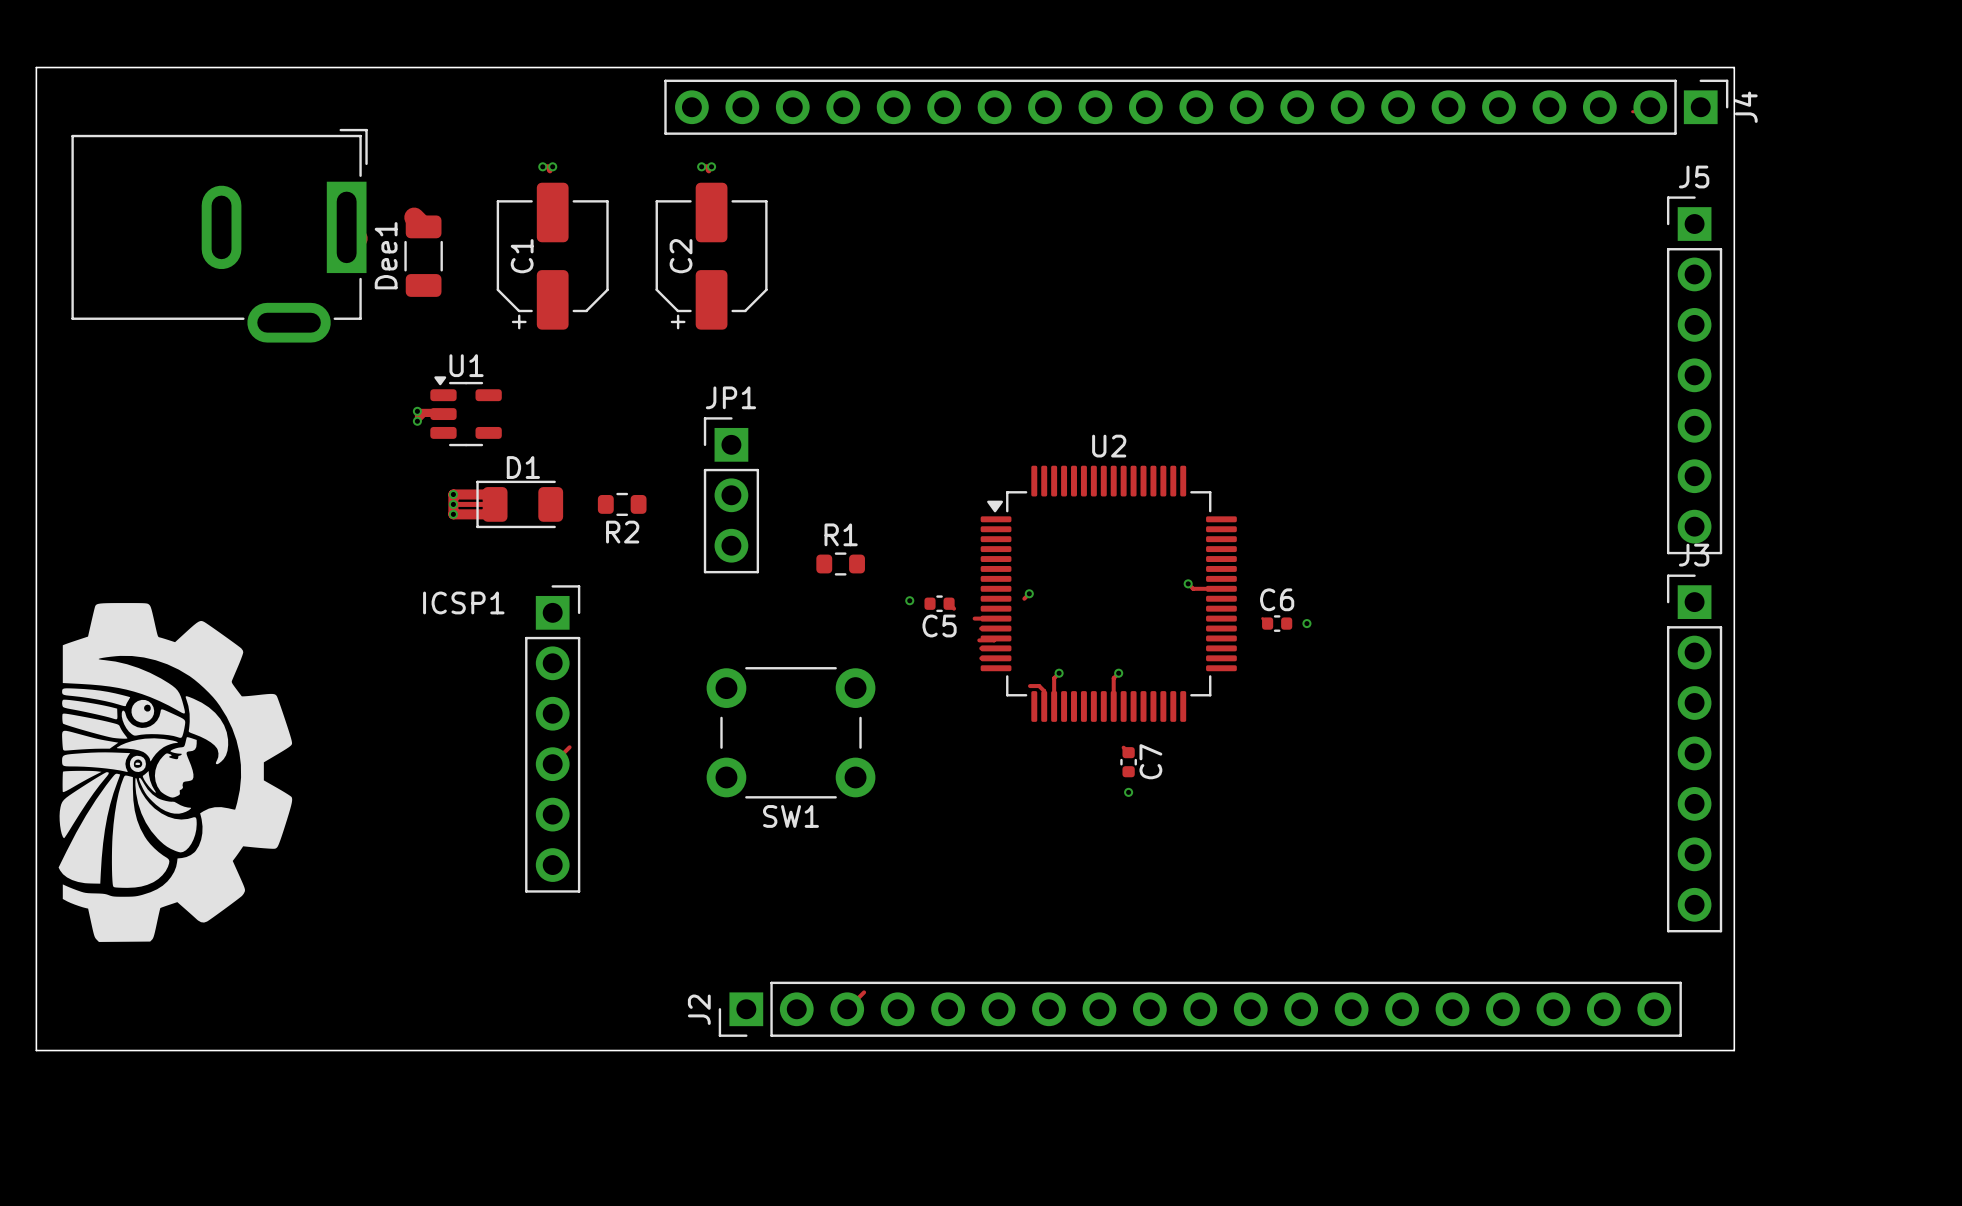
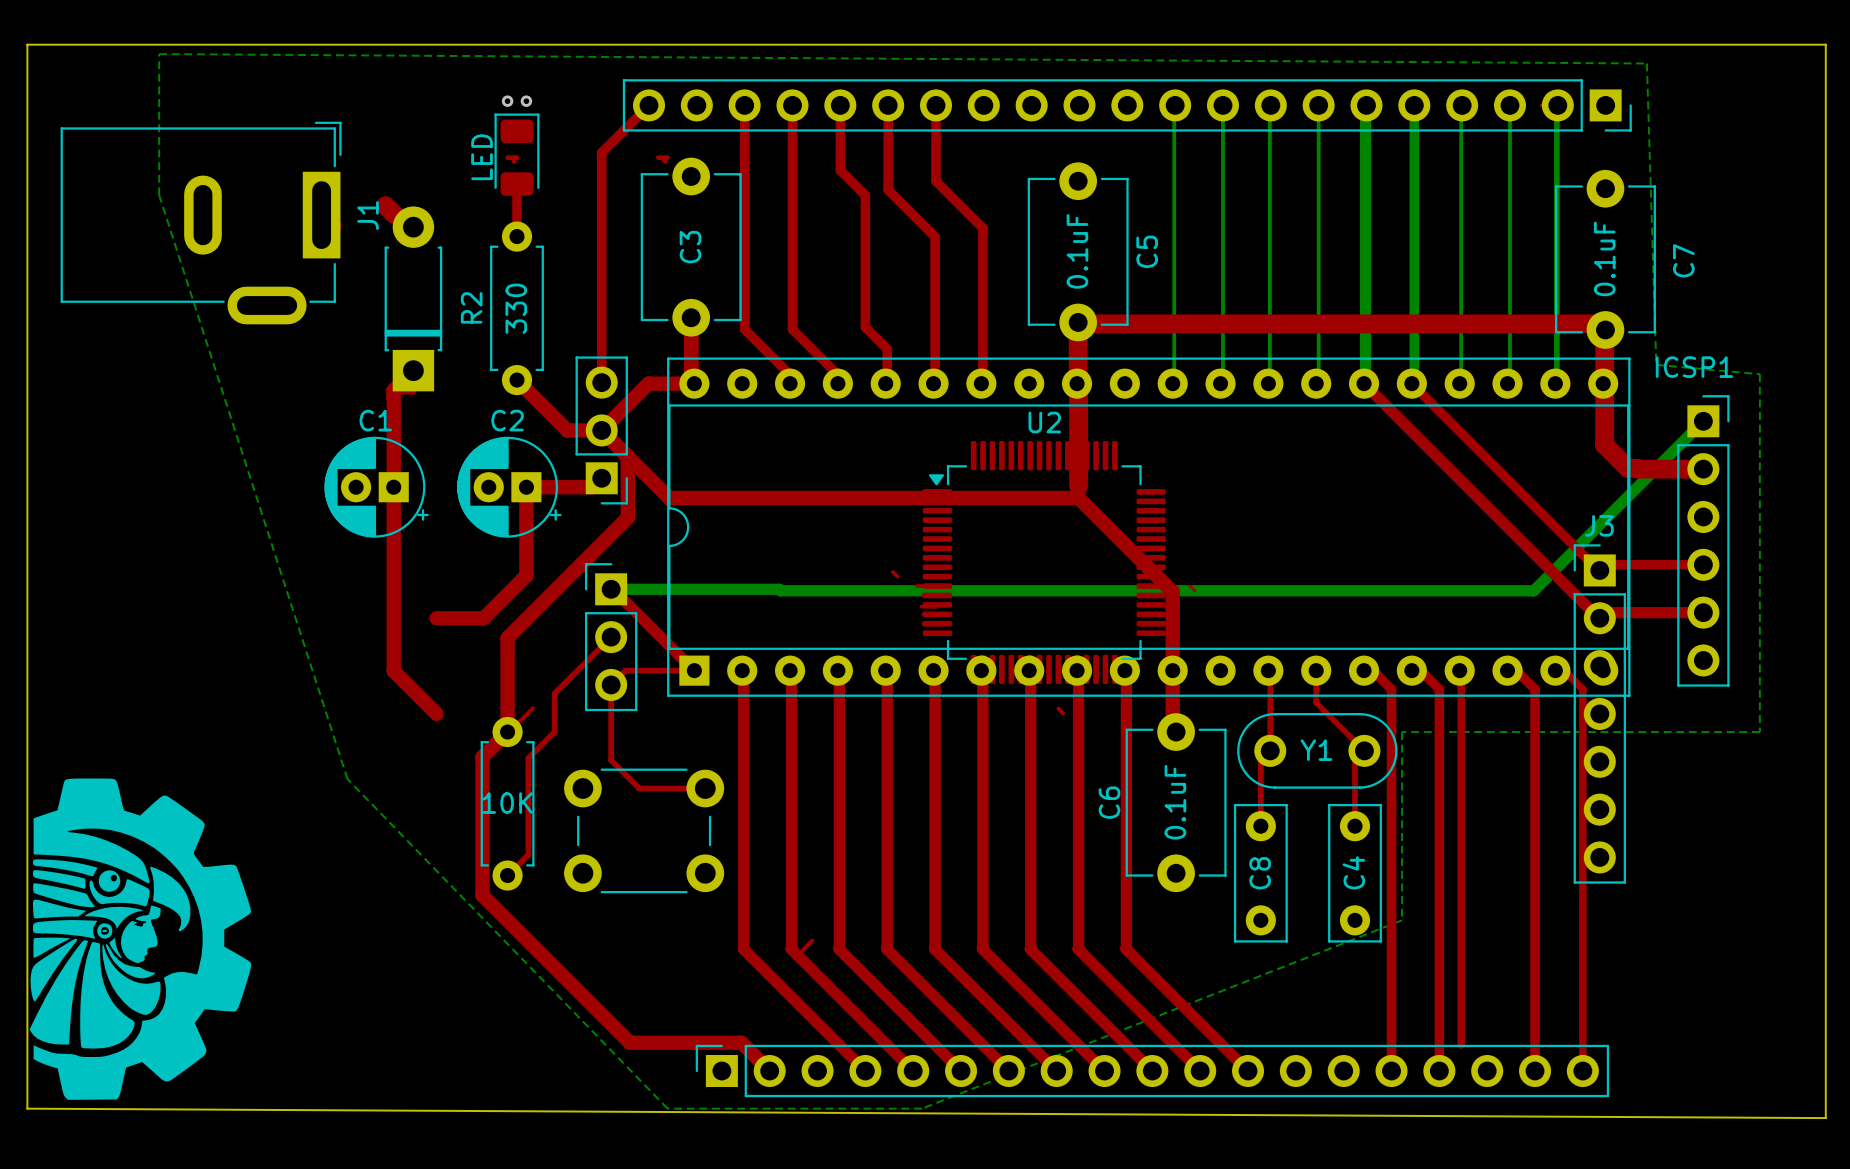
bottom zone outline: none -> (159, 54) (1646, 63) (1656, 364) (1759, 374) (1759, 732) (1402, 732) (1402, 920) (921, 1108) (667, 1108) (347, 779) (159, 195) (159, 54)
board edge: (36, 67) (1734, 67) (1734, 1050) (36, 1050) -> (27, 63) (27, 44) (1825, 44) (1825, 1118) (27, 1108) (27, 995)
via: none -> (507, 101)
via: none -> (526, 101)
J4: (1196, 107) -> none
top track: none -> (649, 105) (601, 152) (601, 382)
top track: none -> (744, 105) (744, 329) (791, 376)
top track: none -> (792, 105) (792, 329) (839, 376)
top track: none -> (840, 105) (840, 170) (865, 195) (865, 327) (887, 348) (887, 376)
top track: none -> (888, 105) (888, 189) (935, 236) (935, 376)
top track: none -> (936, 105) (936, 181) (982, 228) (982, 376)
part: none -> (1127, 105)
bottom track: none -> (1222, 105) (1222, 376)
bottom track: none -> (1318, 105) (1317, 376)
bottom track: none -> (1366, 105) (1365, 376)
bottom track: none -> (1414, 105) (1413, 376)
bottom track: none -> (1509, 105) (1509, 376)
bottom track: none -> (1174, 106) (1174, 376)
bottom track: none -> (1269, 106) (1269, 376)
bottom track: none -> (1461, 106) (1461, 376)
bottom track: none -> (1556, 106) (1556, 376)
part: none -> LED (516, 154)
via: (542, 166) -> none
via: (552, 166) -> none
via: (701, 166) -> none
via: (711, 166) -> none
C1 footprint: [496, 182, 609, 330] -> [324, 436, 429, 538]
C2 footprint: [655, 182, 768, 330] -> [457, 436, 562, 538]
top track: none -> (516, 184) (516, 236)
J1 name: none -> J1 (367, 215)
Dee1: (423, 256) -> none
C1 name position: C1 (522, 256) -> C1 (375, 420)
C2 name position: C2 (681, 256) -> C2 (507, 420)
C3: none -> (691, 247)
C5 value: none -> 0.1uF (1077, 251)
C7 value: none -> 0.1uF (1604, 258)
part: none -> (413, 298)
R2 value: none -> 330 (516, 308)
top track: none -> (691, 317) (691, 380) (694, 383) (648, 383) (601, 430)
J5: (1694, 375) -> none
top track: none -> (413, 370) (393, 390) (393, 671) (436, 713)
top track: none -> (522, 380) (516, 380) (567, 430) (601, 430)
top track: none -> (1364, 383) (1593, 612) (1703, 612)
top track: none -> (1411, 383) (1593, 564) (1703, 564)
via: (417, 411) -> none
U1: (466, 411) -> none
via: (417, 421) -> none
bottom track: none -> (1703, 421) (1533, 590) (611, 589)
top track: none -> (601, 430) (669, 497) (1078, 497)
part: none -> (601, 430)
top track: none -> (627, 456) (627, 517) (507, 637) (507, 732) (482, 757) (482, 895) (629, 1042) (741, 1042) (769, 1070)
R2 footprint: [597, 492, 647, 516] -> [490, 221, 544, 396]
via: (453, 494) -> none
JP1: (731, 495) -> none
top track: none -> (1703, 469) (1628, 468) (1604, 445) (1605, 329) (1599, 323) (1078, 323) (1078, 485)
top track: (453, 504) (495, 504) -> none
via: (453, 504) -> none
top track: (495, 504) (485, 514) (453, 514) (453, 494) (485, 494) (495, 504) -> none
D1: (519, 504) -> none
top track: none -> (601, 478) (592, 487) (526, 487)
top track: none -> (526, 482) (526, 575) (483, 618) (436, 618)
via: (453, 514) -> none
top track: none -> (1078, 497) (1172, 592) (1172, 728) (1176, 732)
R2 name position: R2 (622, 532) -> R2 (471, 307)
part: none -> (1148, 527)
R1: (840, 563) -> none
top track: (1188, 583) (1193, 588) (1221, 588) -> none
via: (1188, 583) -> none
top track: (1029, 593) (1024, 598) -> none
via: (1029, 593) -> none
C5 footprint: [924, 595, 955, 613] -> [1027, 162, 1129, 342]
C6 name position: C6 (1277, 599) -> C6 (1109, 802)
via: (909, 600) -> none
ICSP1 name position: ICSP1 (463, 602) -> ICSP1 (1694, 367)
C6 footprint: [1262, 615, 1293, 632] -> [1125, 713, 1227, 893]
top track: none -> (611, 589) (694, 670) (625, 670) (611, 684) (611, 760) (639, 788) (705, 788)
via: (1306, 623) -> none
C5 name position: C5 (939, 626) -> C5 (1147, 251)
top track: none -> (611, 637) (554, 693) (554, 732) (528, 758) (528, 854) (507, 875)
part: none -> (611, 637)
top track: (1059, 673) (1054, 678) (1054, 706) -> none
via: (1059, 673) -> none
top track: (1118, 673) (1113, 678) (1113, 706) -> none
via: (1118, 673) -> none
top track: (1030, 686) (1039, 686) (1044, 691) (1044, 706) -> none
top track: none -> (743, 663) (743, 949) (865, 1070)
top track: none -> (791, 663) (791, 948) (913, 1070)
top track: none -> (839, 663) (838, 948) (961, 1070)
top track: none -> (887, 663) (886, 948) (1008, 1070)
top track: none -> (935, 663) (934, 948) (1056, 1070)
top track: none -> (982, 663) (982, 948) (1104, 1070)
top track: none -> (1030, 663) (1030, 948) (1152, 1070)
top track: none -> (1078, 663) (1078, 948) (1200, 1070)
top track: none -> (1126, 663) (1125, 948) (1248, 1070)
top track: none -> (1365, 663) (1391, 689) (1391, 1070)
top track: none -> (1461, 663) (1461, 1045)
top track: none -> (1556, 663) (1582, 689) (1582, 1070)
top track: none -> (1316, 670) (1316, 702) (1364, 750) (1355, 760) (1355, 826)
top track: none -> (1260, 678) (1268, 670) (1270, 672) (1270, 750) (1260, 760) (1260, 826)
top track: none -> (1439, 689) (1413, 663) (1439, 689) (1439, 1070)
top track: none -> (1535, 689) (1509, 663) (1535, 689) (1535, 1070)
SW1: (791, 732) -> none
ICSP1 position: (552, 738) -> (1703, 540)
C7 footprint: [1120, 747, 1137, 778] -> [1554, 169, 1656, 349]
C7 name position: C7 (1150, 761) -> C7 (1683, 260)
drawing position: (175, 772) -> (140, 939)
via: (1128, 792) -> none
Y1: none -> (1317, 750)
C6 value: none -> 0.1uF (1175, 802)
part: none -> 10K (507, 803)
part: none -> (644, 830)
C8: none -> (1260, 873)
C4: none -> (1355, 873)
J2: (1200, 1009) -> none
part: none -> (1152, 1070)

